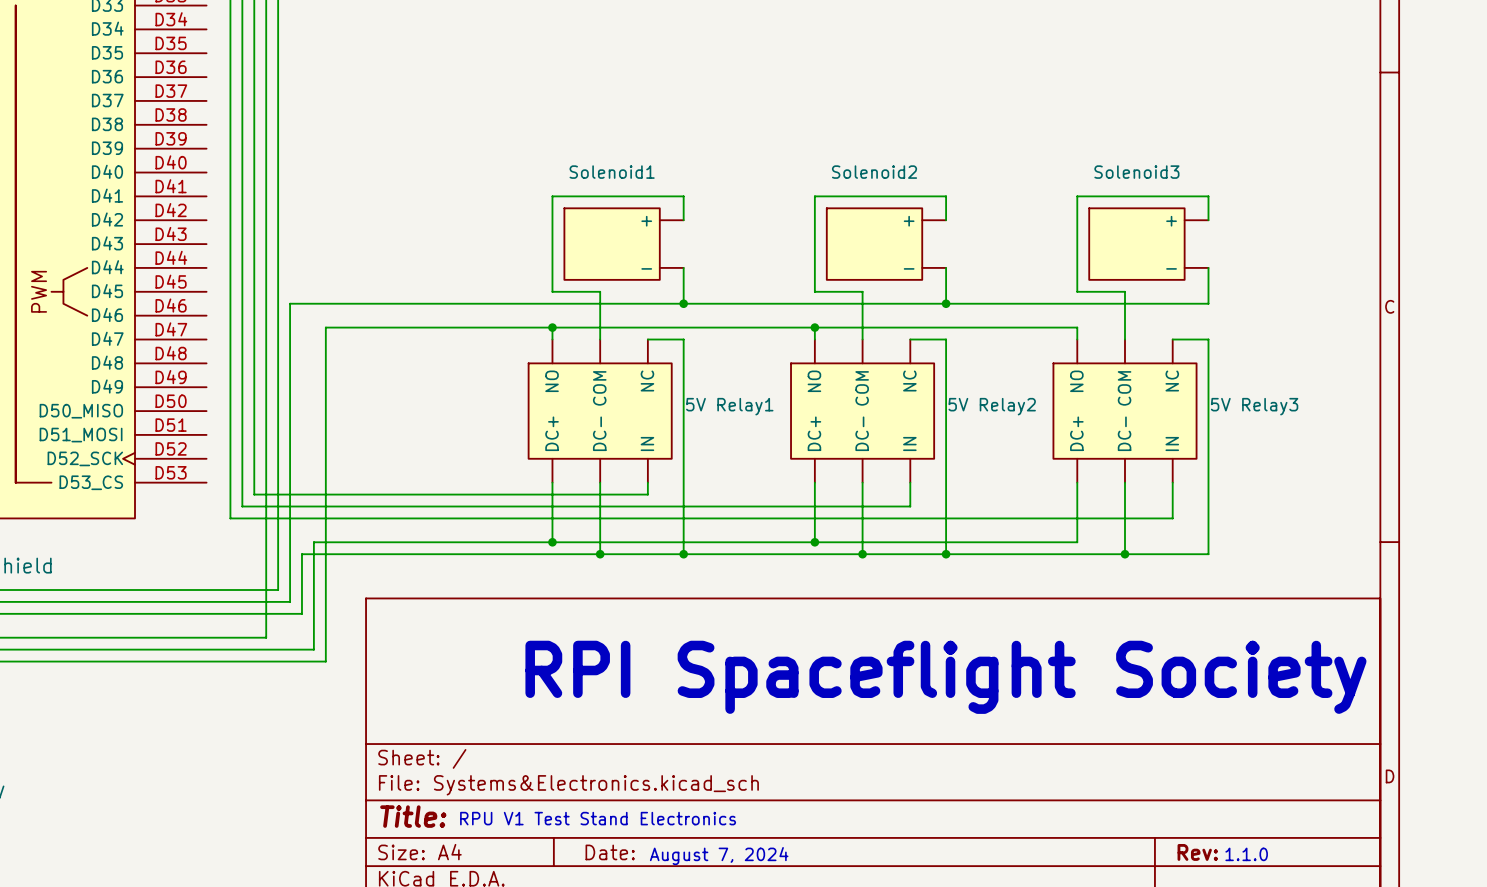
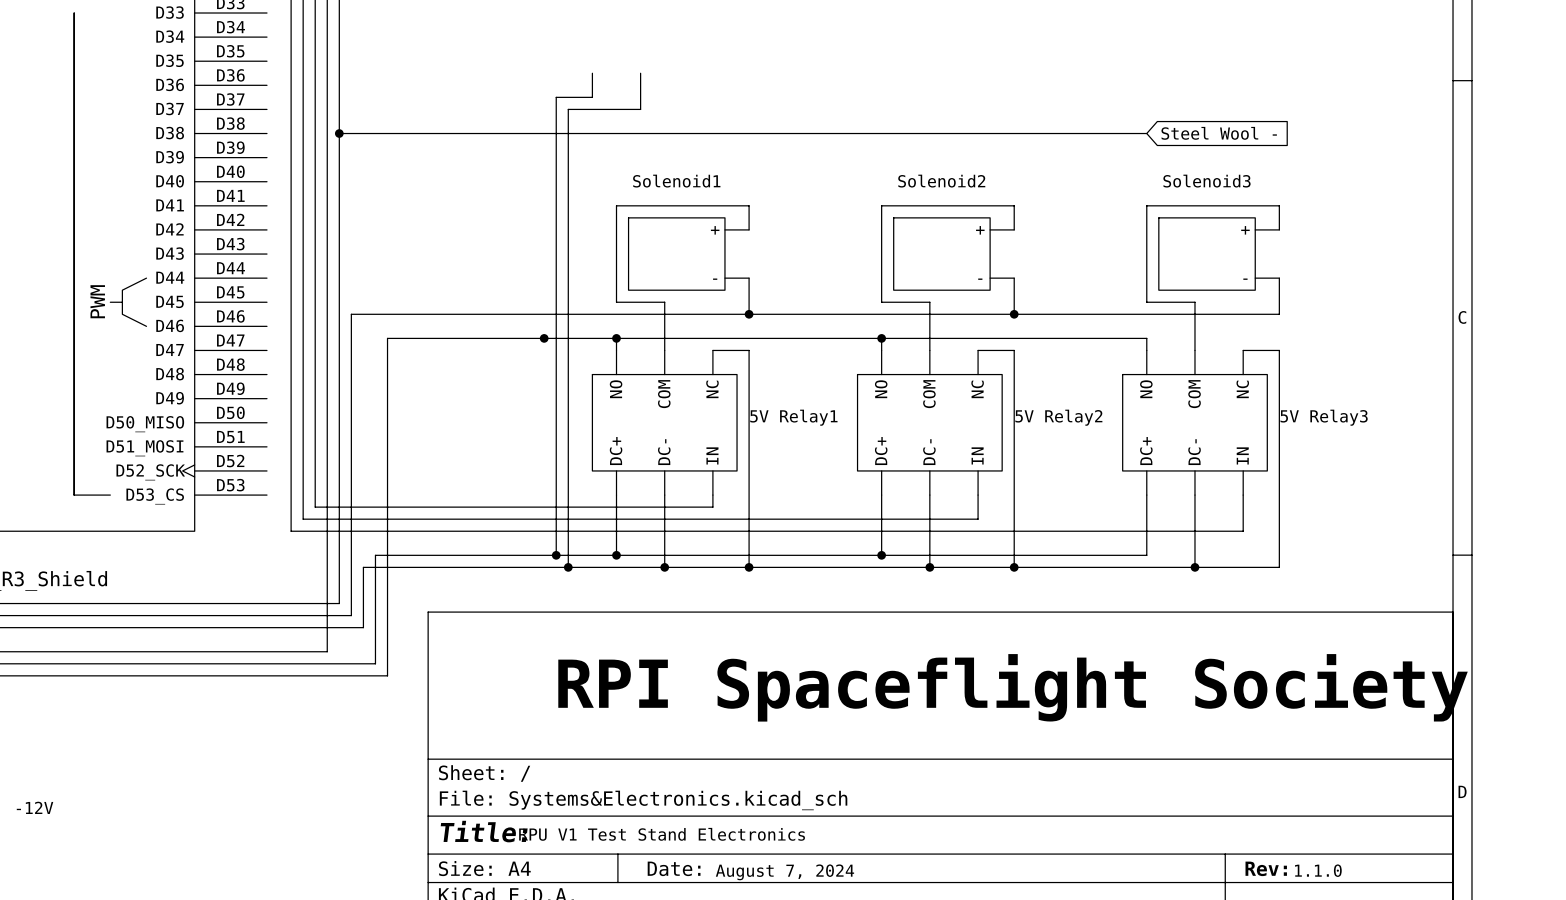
wire: none -> (592, 73) (592, 97) (556, 97) (556, 555)
wire: none -> (640, 73) (640, 109) (568, 109) (568, 567)
wire: none -> (339, 133) (1146, 133)
junction: none -> (339, 133)
global label: none -> Steel Wool - (1219, 133)
junction: none -> (544, 338)
junction: none -> (556, 555)
junction: none -> (568, 567)

